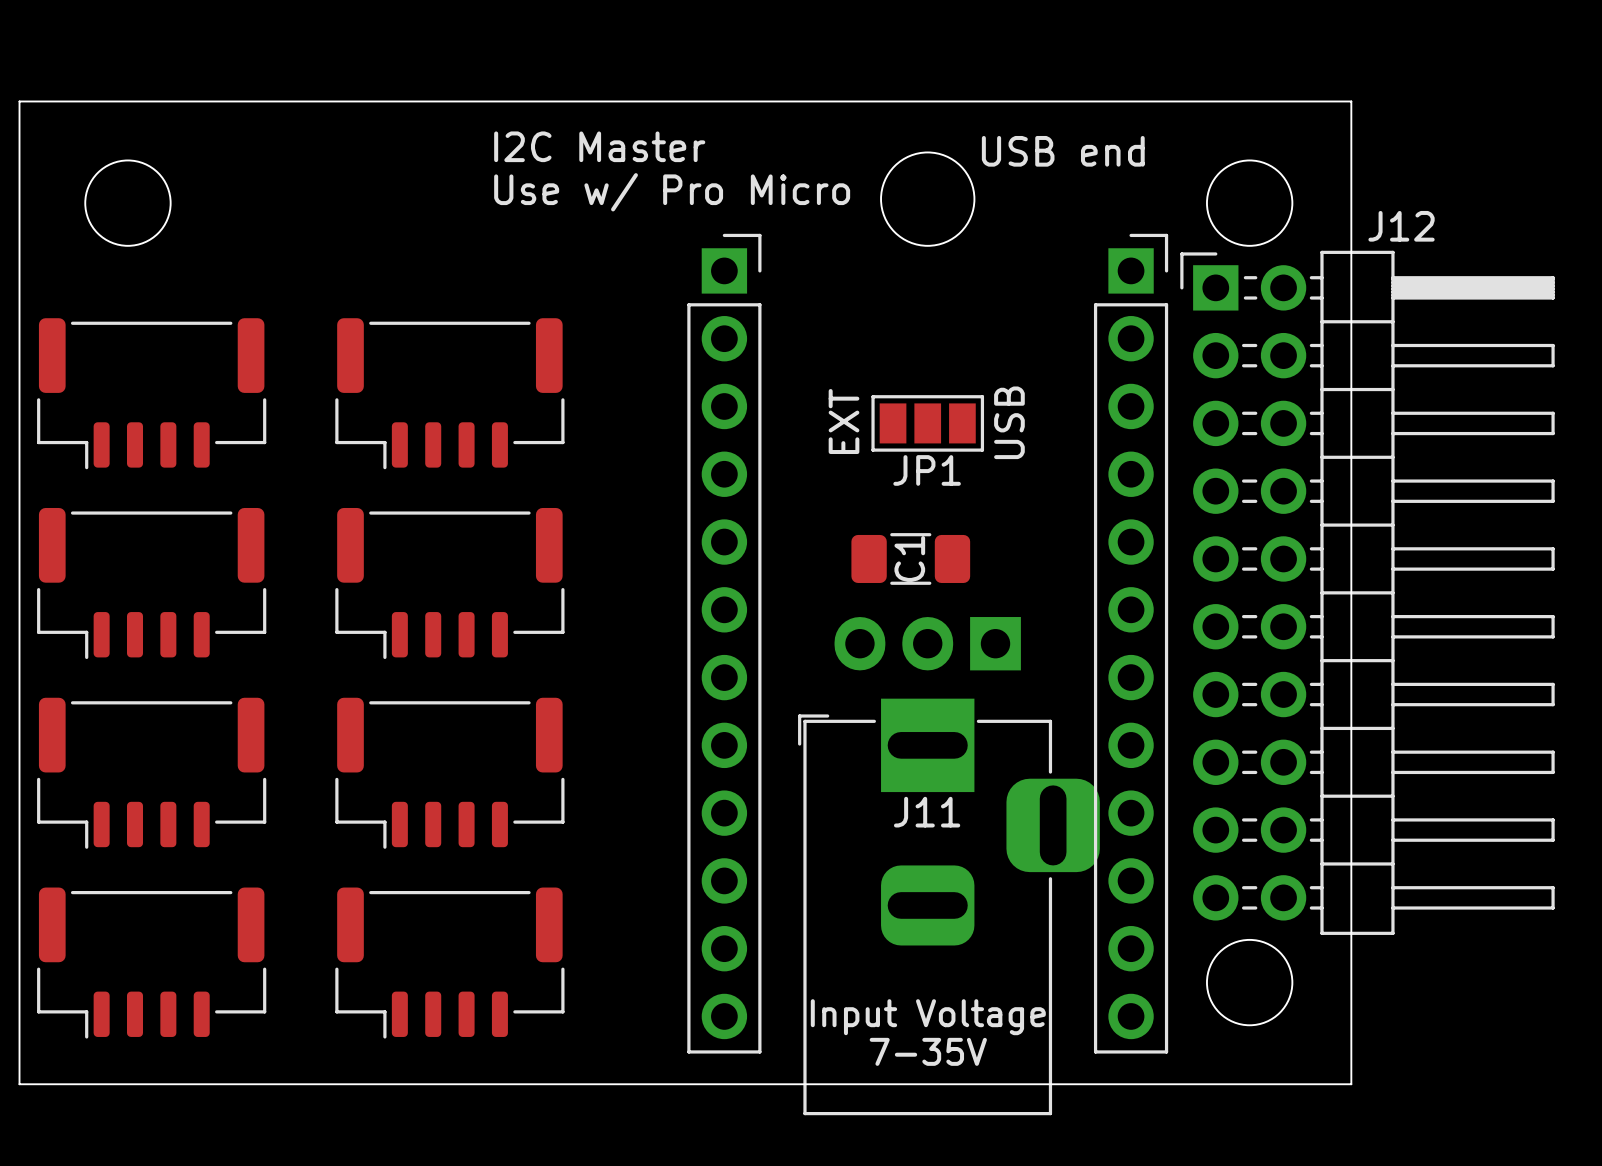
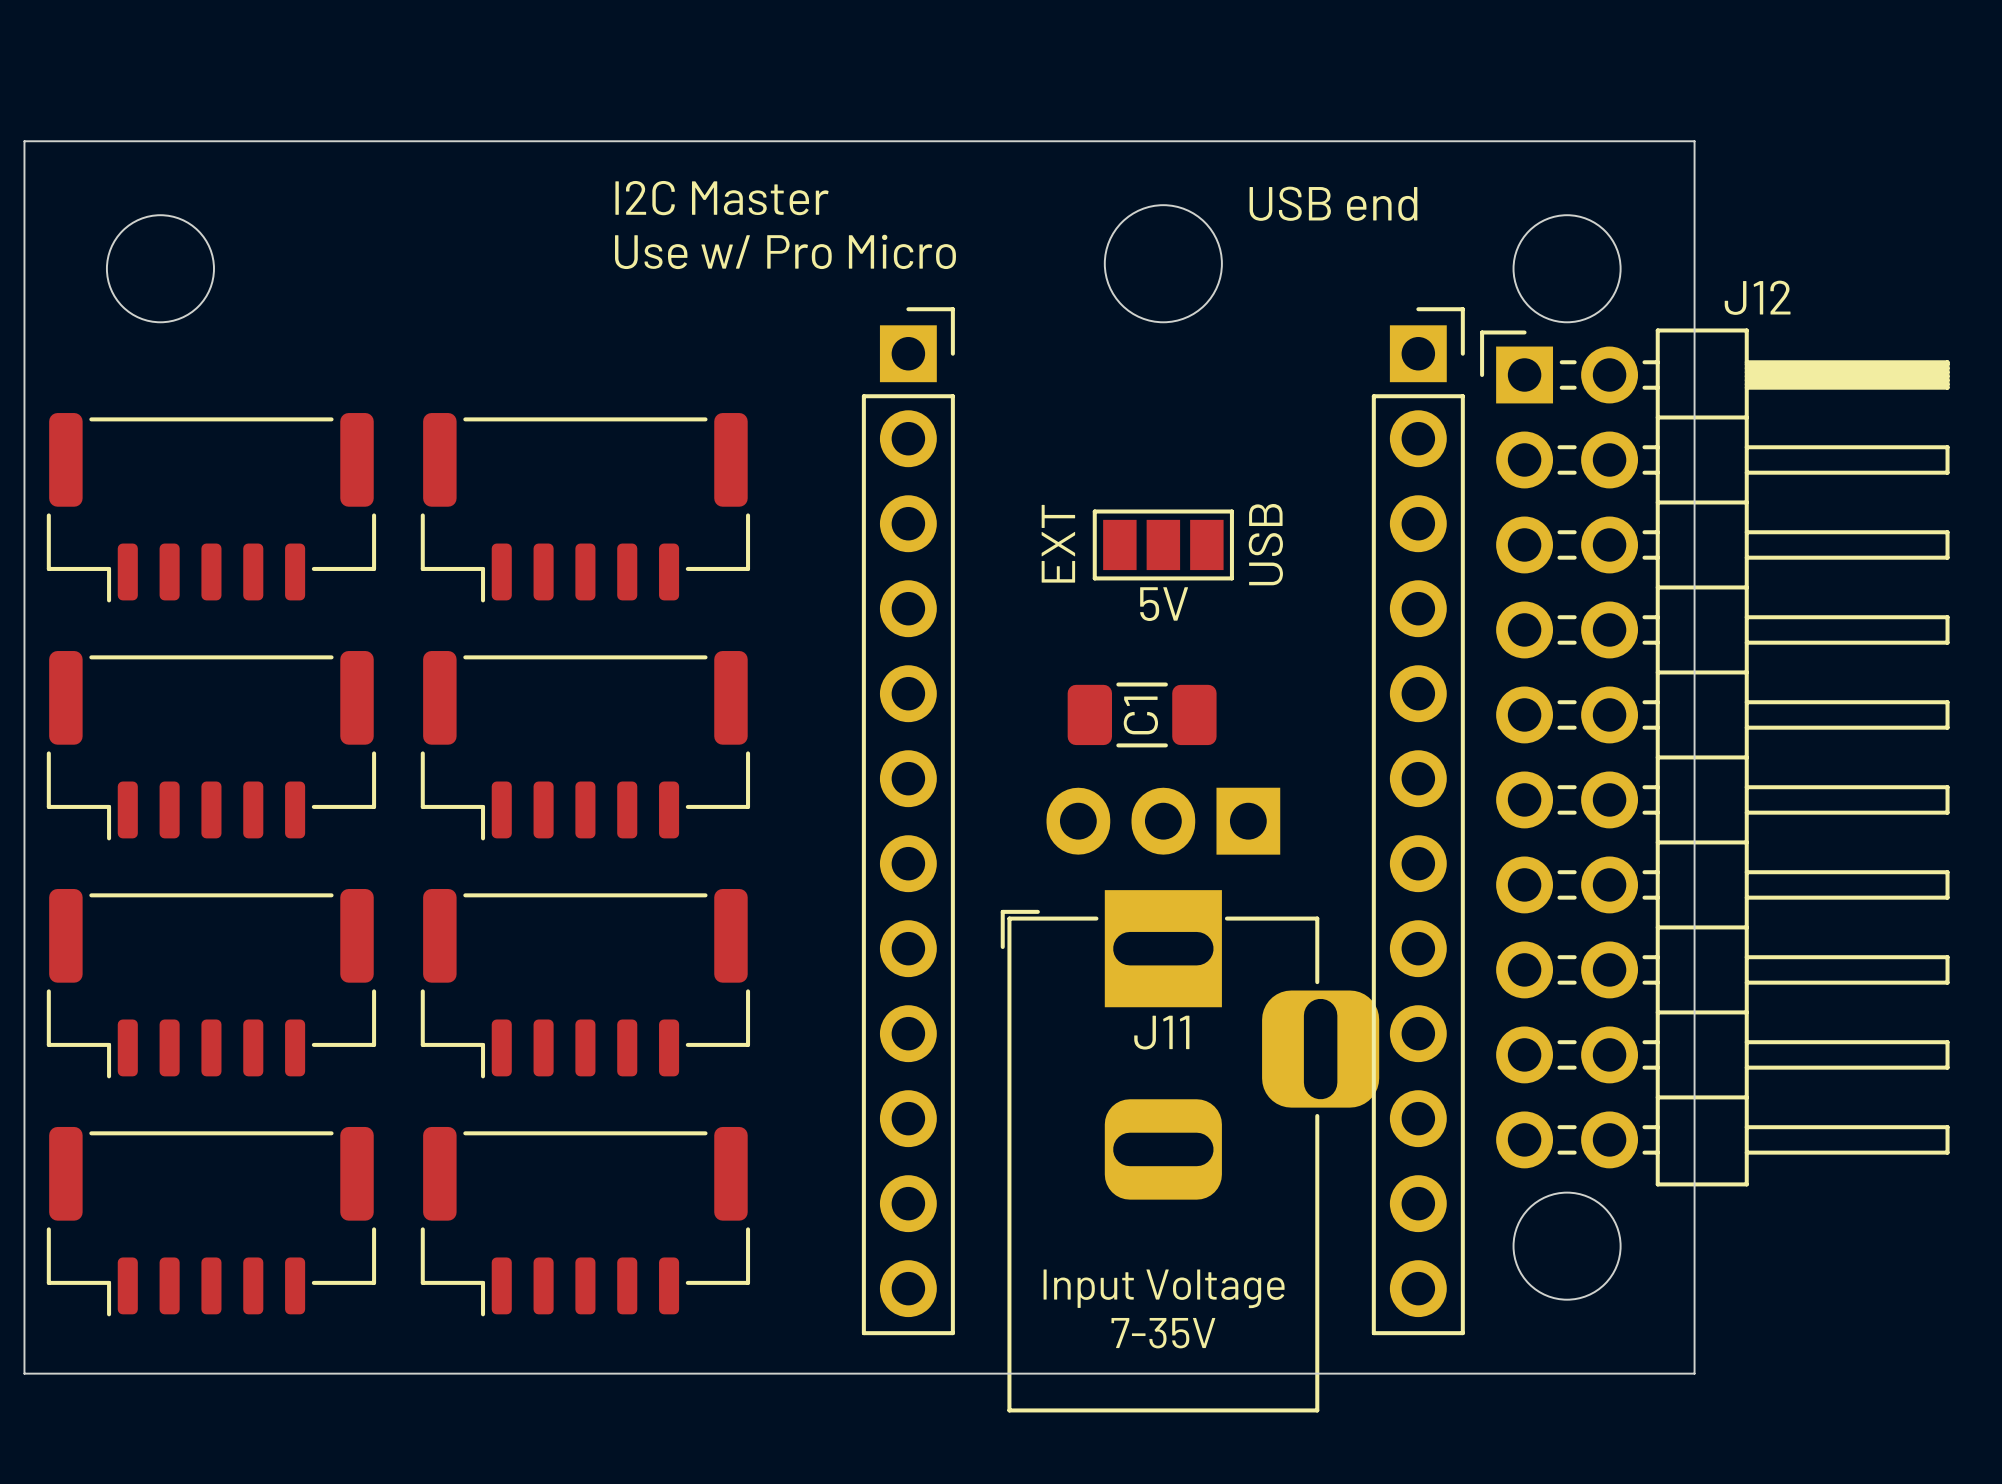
part footprint: [37, 318, 267, 470] -> [46, 413, 377, 603]
part footprint: [335, 318, 565, 470] -> [420, 413, 751, 603]
JP1 name: JP1 (927, 470) -> 5V (1164, 604)
part footprint: [37, 507, 267, 660] -> [46, 651, 377, 841]
part footprint: [335, 507, 565, 660] -> [420, 651, 751, 841]
part footprint: [37, 697, 267, 849] -> [46, 888, 377, 1079]
part footprint: [335, 697, 565, 849] -> [420, 888, 751, 1079]
part footprint: [37, 887, 267, 1039] -> [46, 1126, 377, 1317]
part footprint: [335, 887, 565, 1039] -> [420, 1126, 751, 1317]

